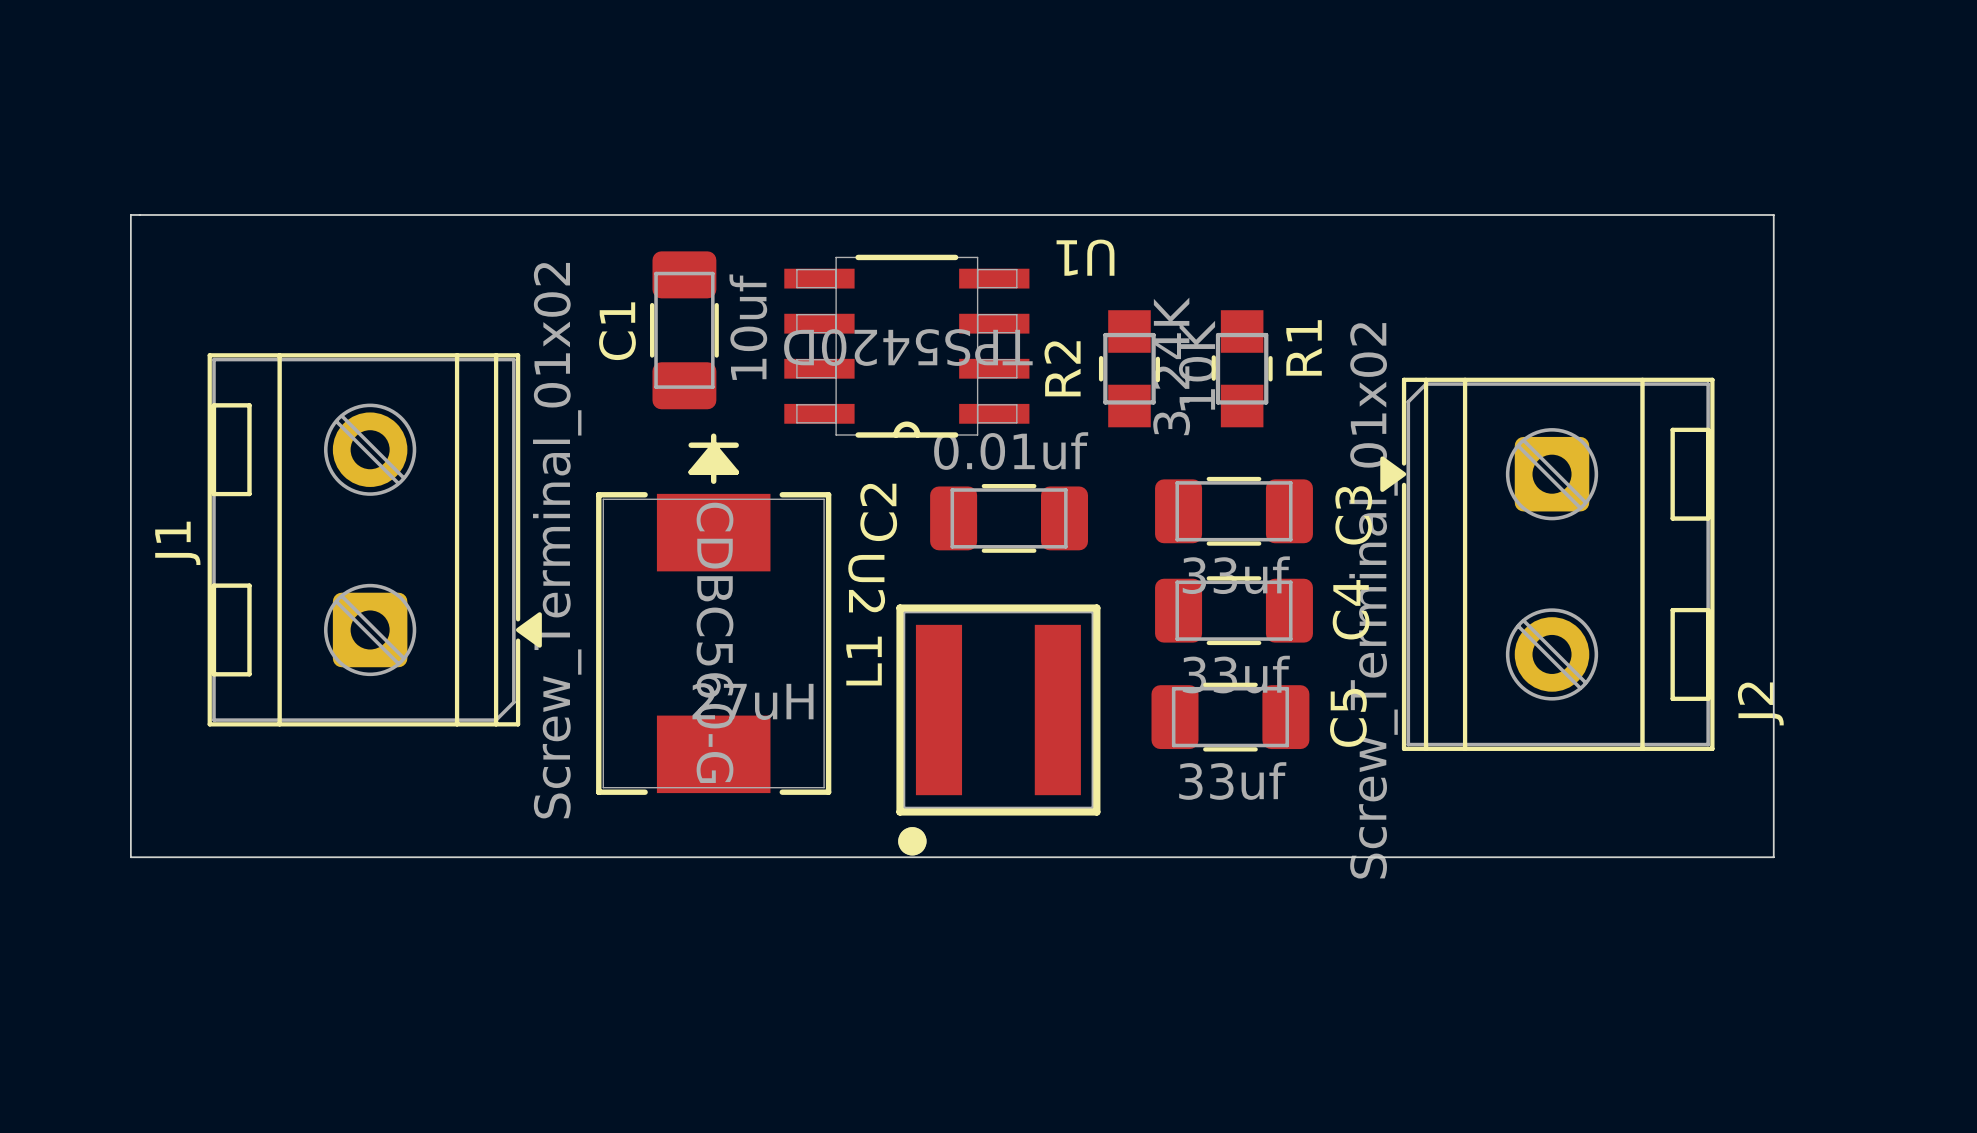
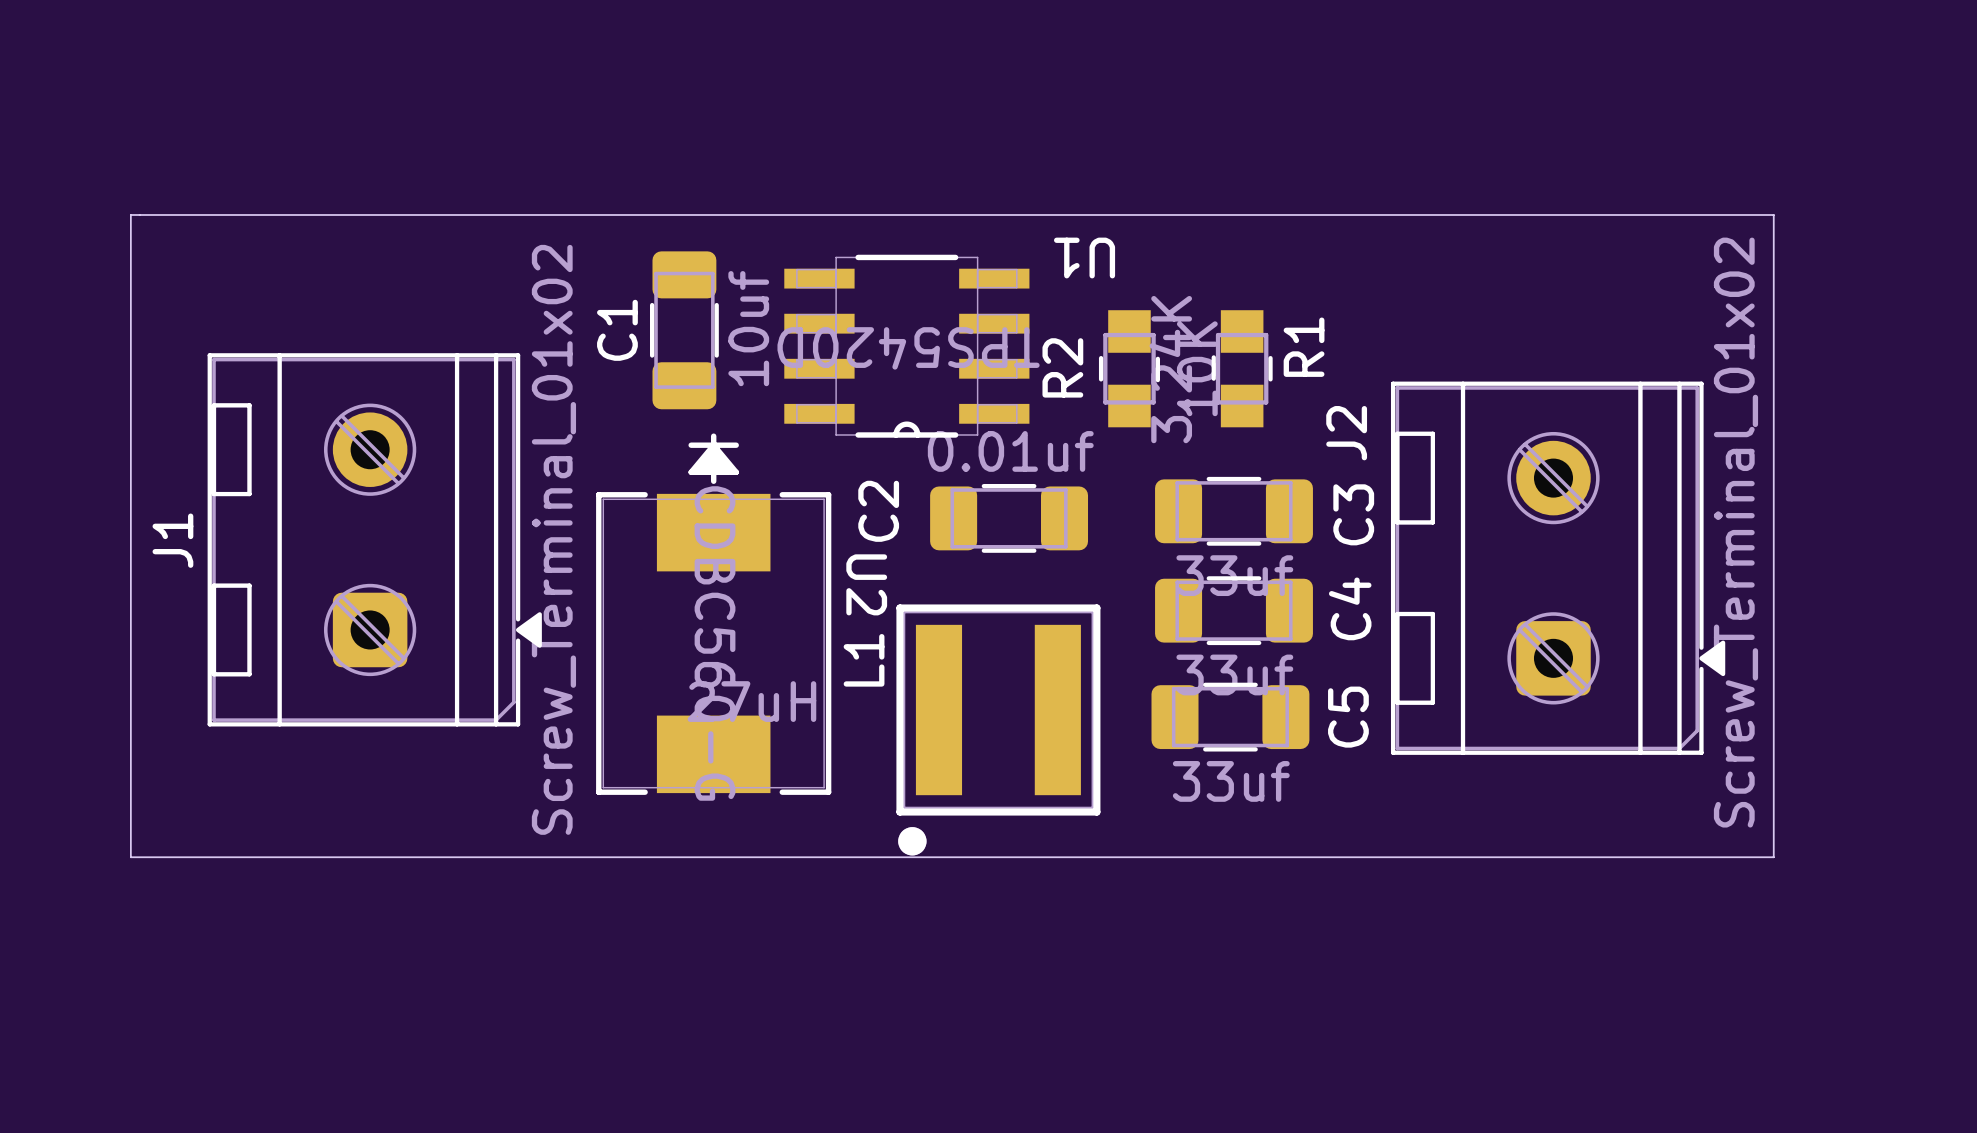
J2 rotation: 0° (1547, 564) -> 180° (1558, 568)

